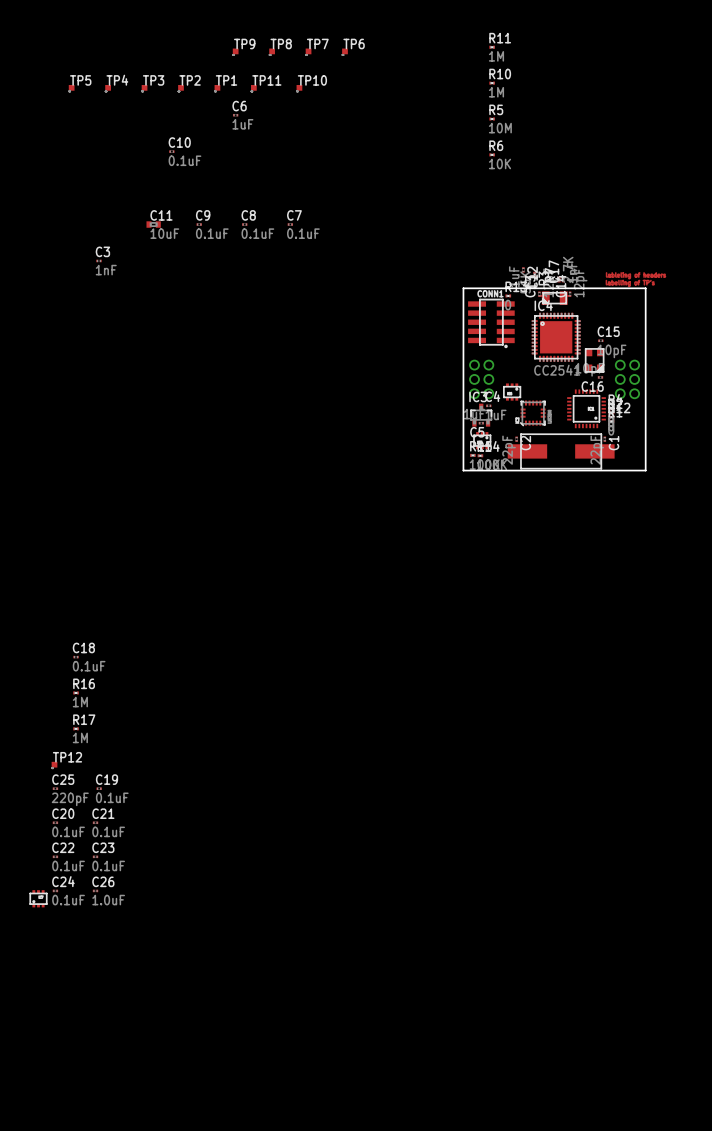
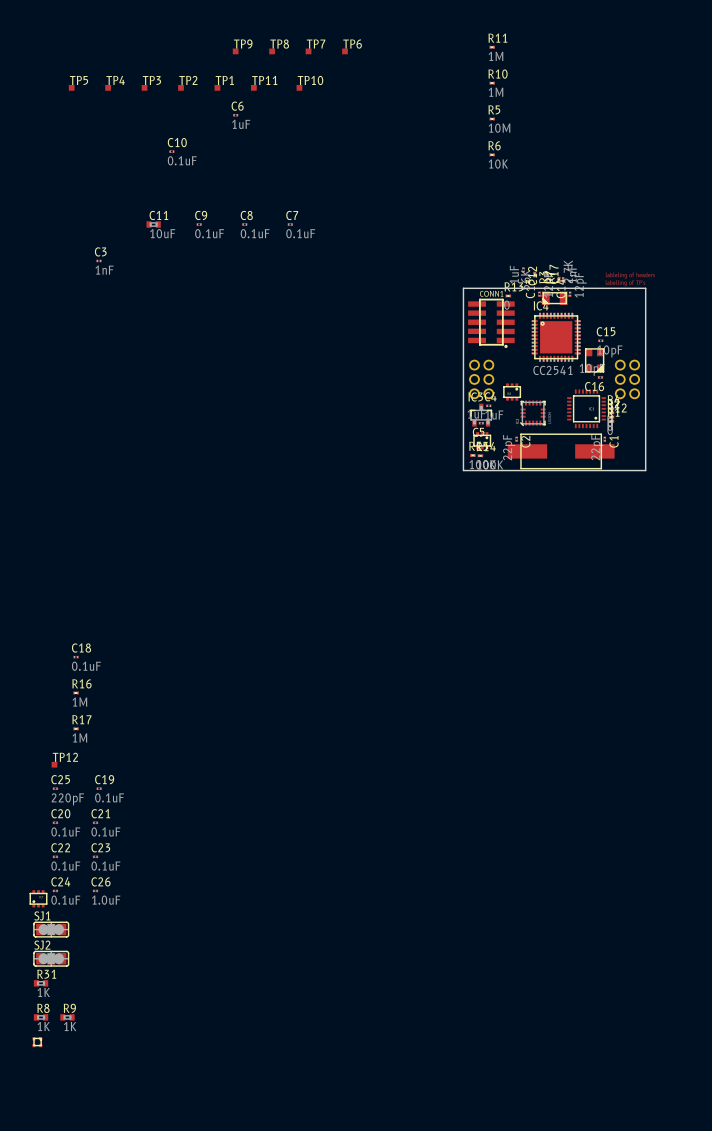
SJ1: none -> (51, 929)
SJ2: none -> (51, 958)
R31: none -> 1K (41, 983)
R8: none -> 1K (41, 1017)
R9: none -> 1K (67, 1017)
part: none -> (37, 1042)

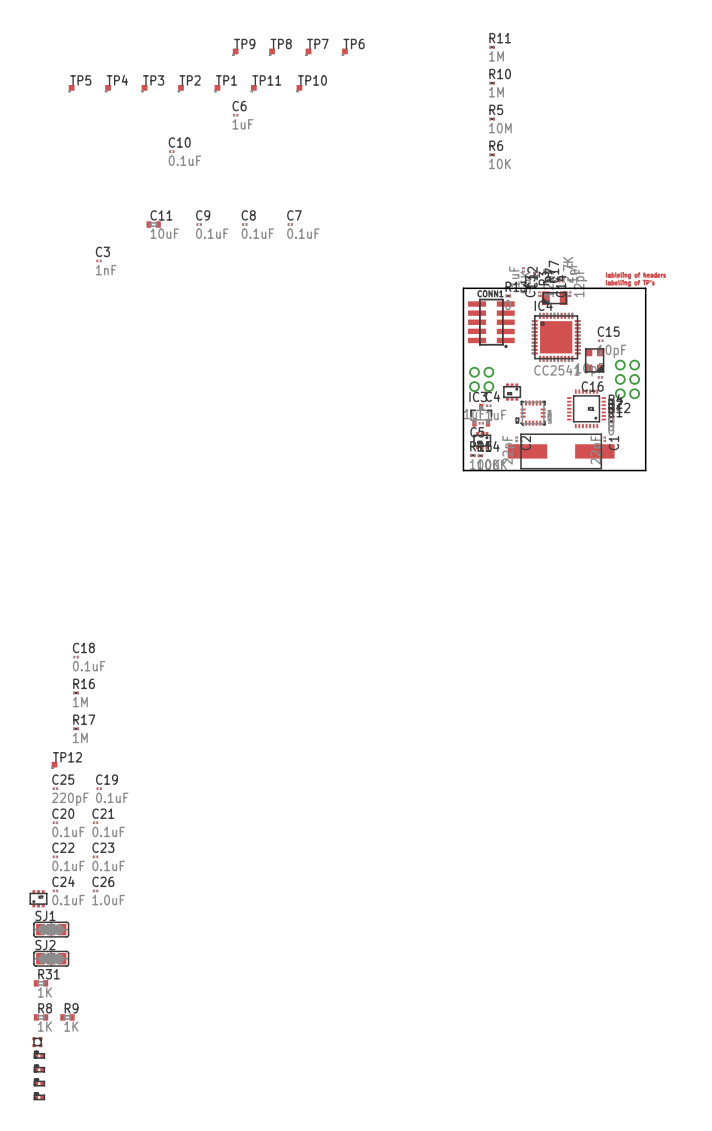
part footprint: [469, 359, 495, 400] -> [469, 366, 495, 393]
part: none -> (39, 1055)
part: none -> (39, 1069)
part: none -> (39, 1083)
part: none -> (39, 1097)

